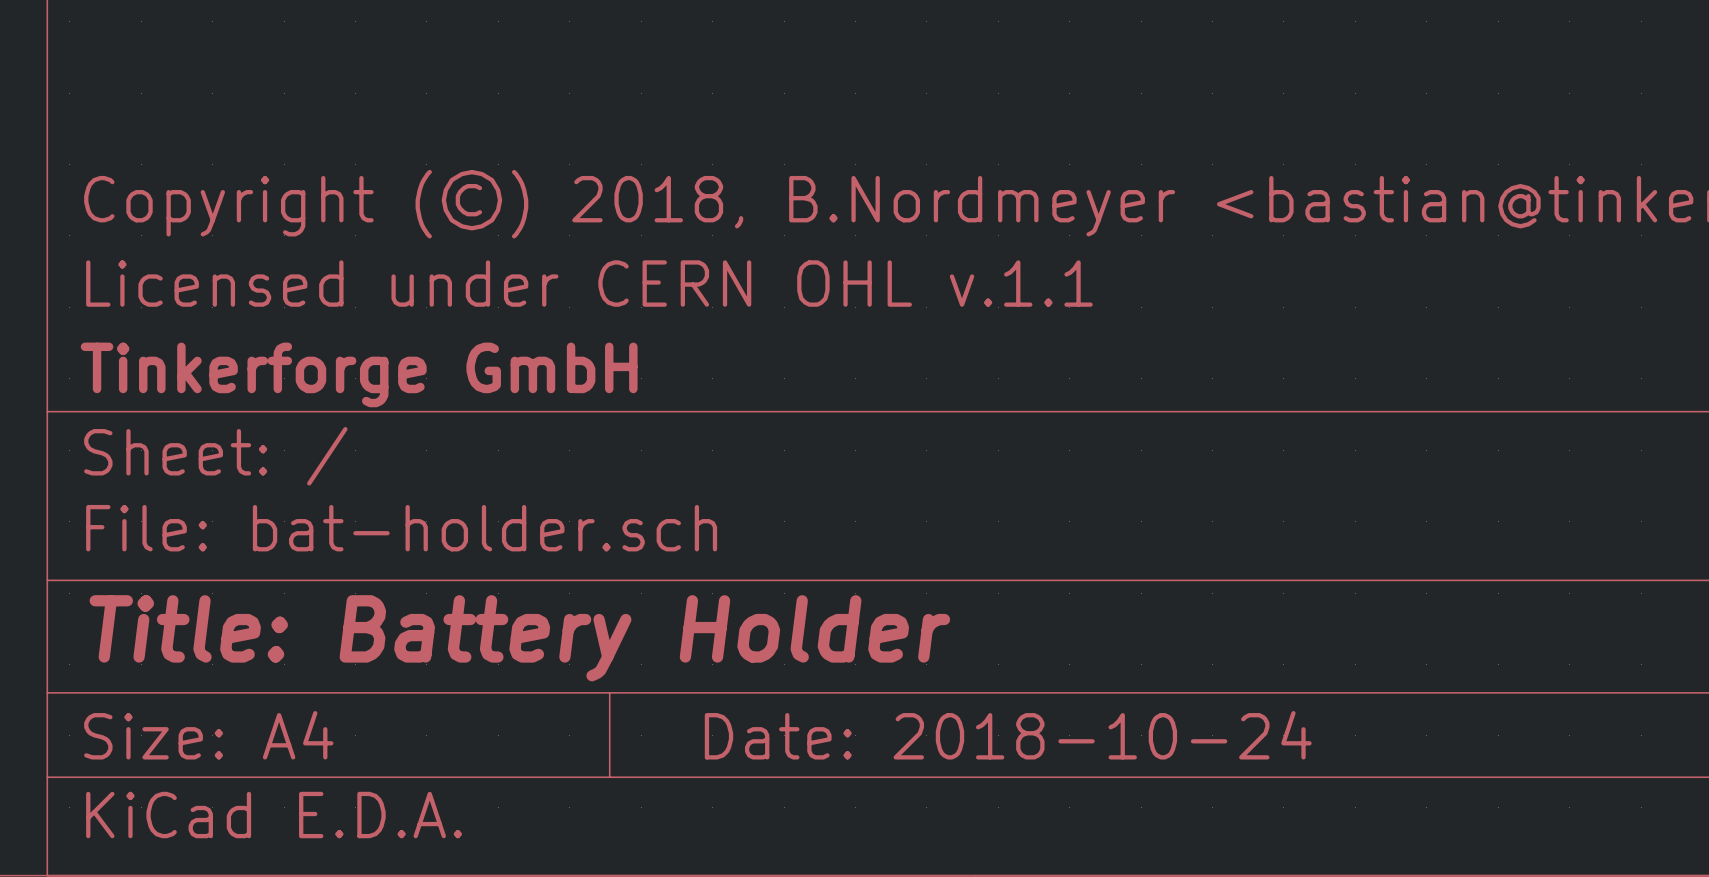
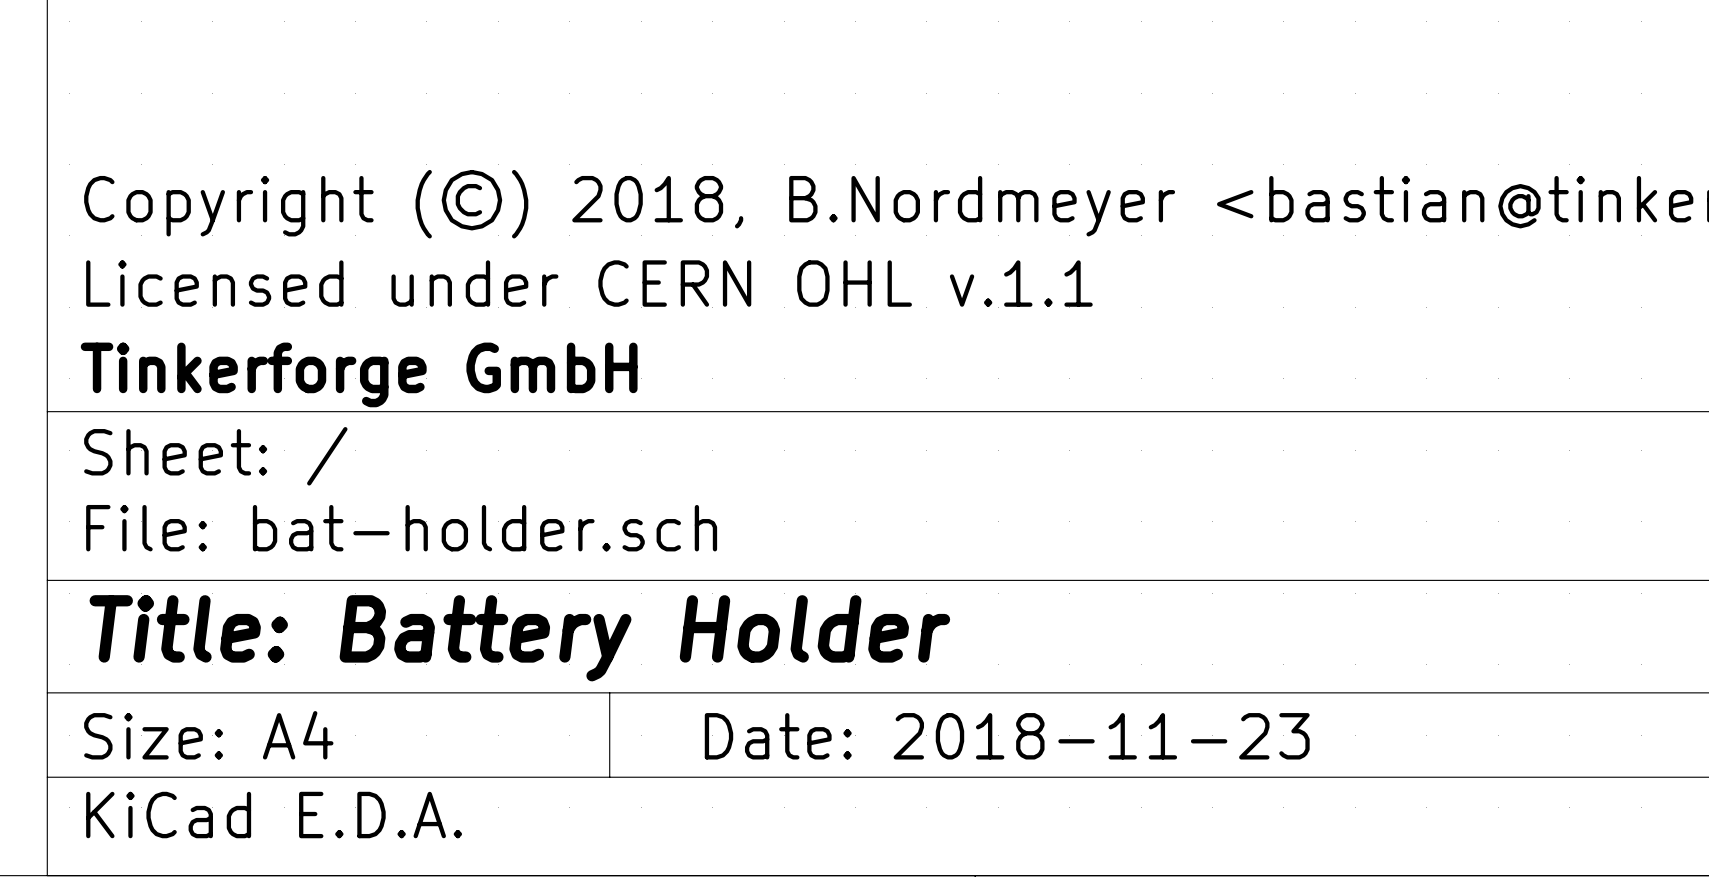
title block: Date: 2018-10-24 (1008, 735) -> Date: 2018-11-23 (1007, 736)

